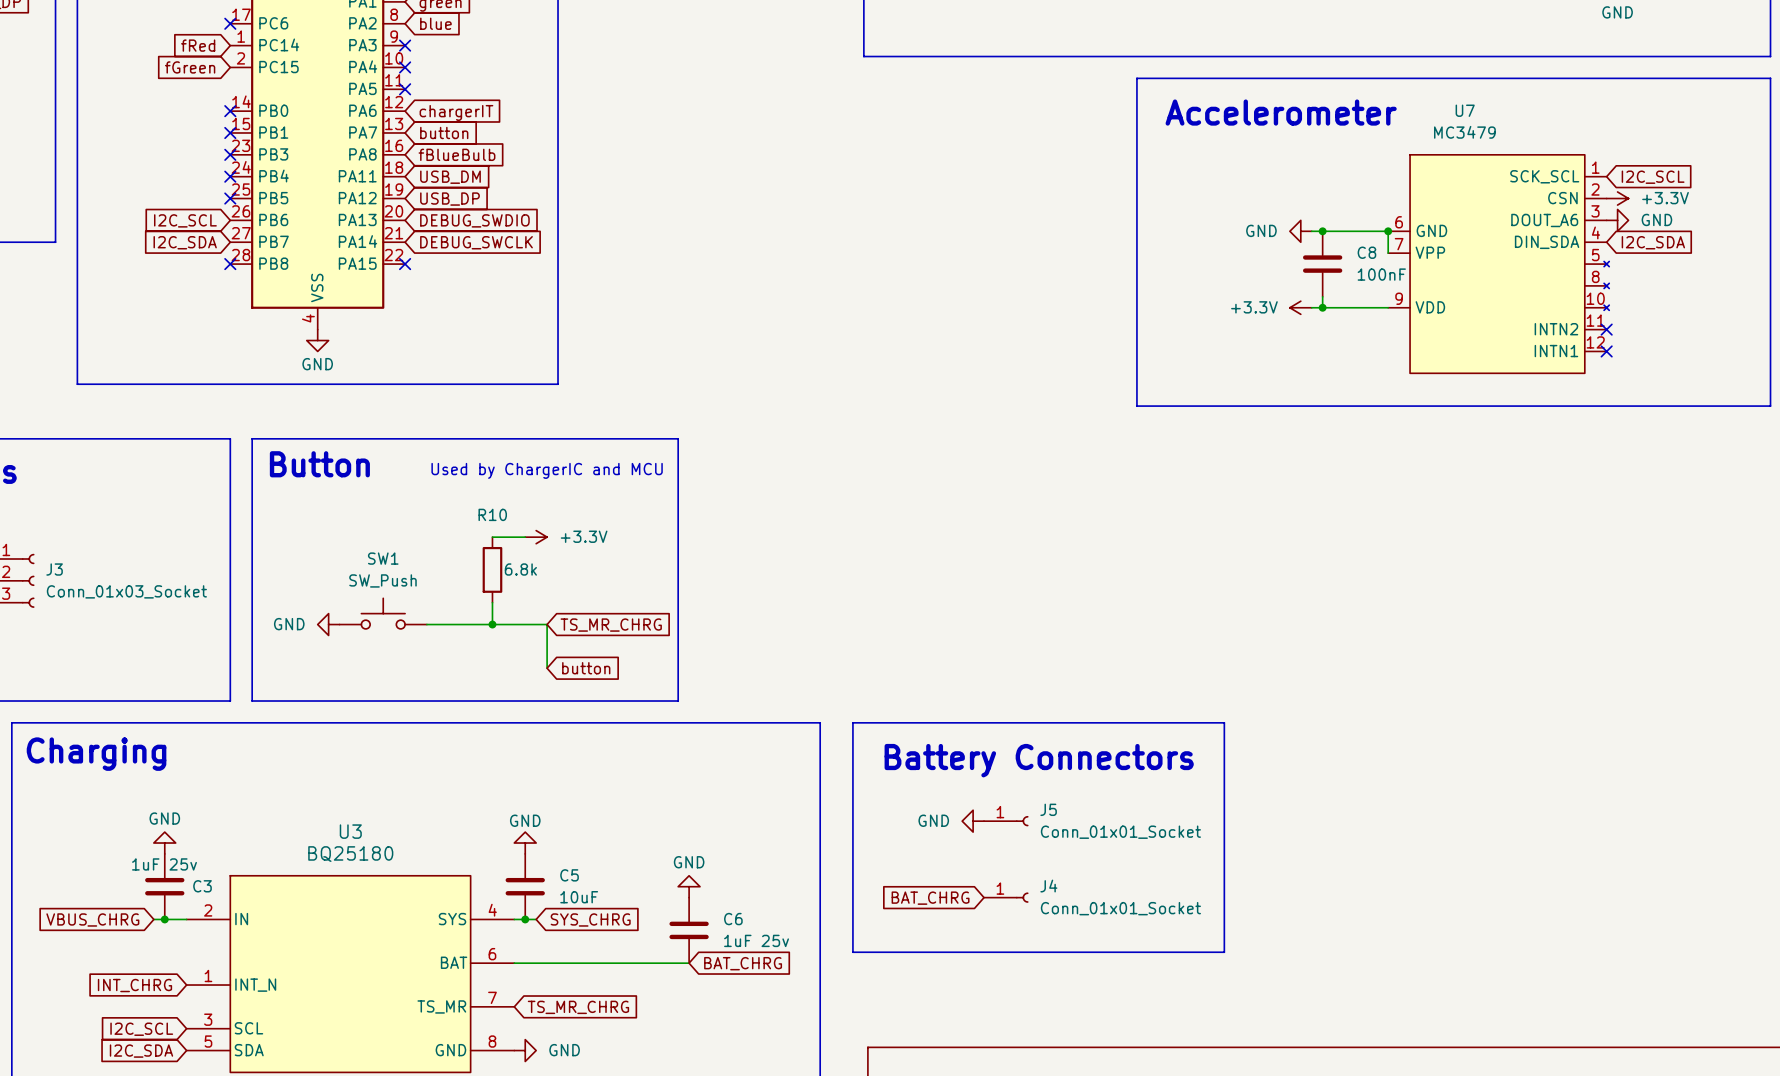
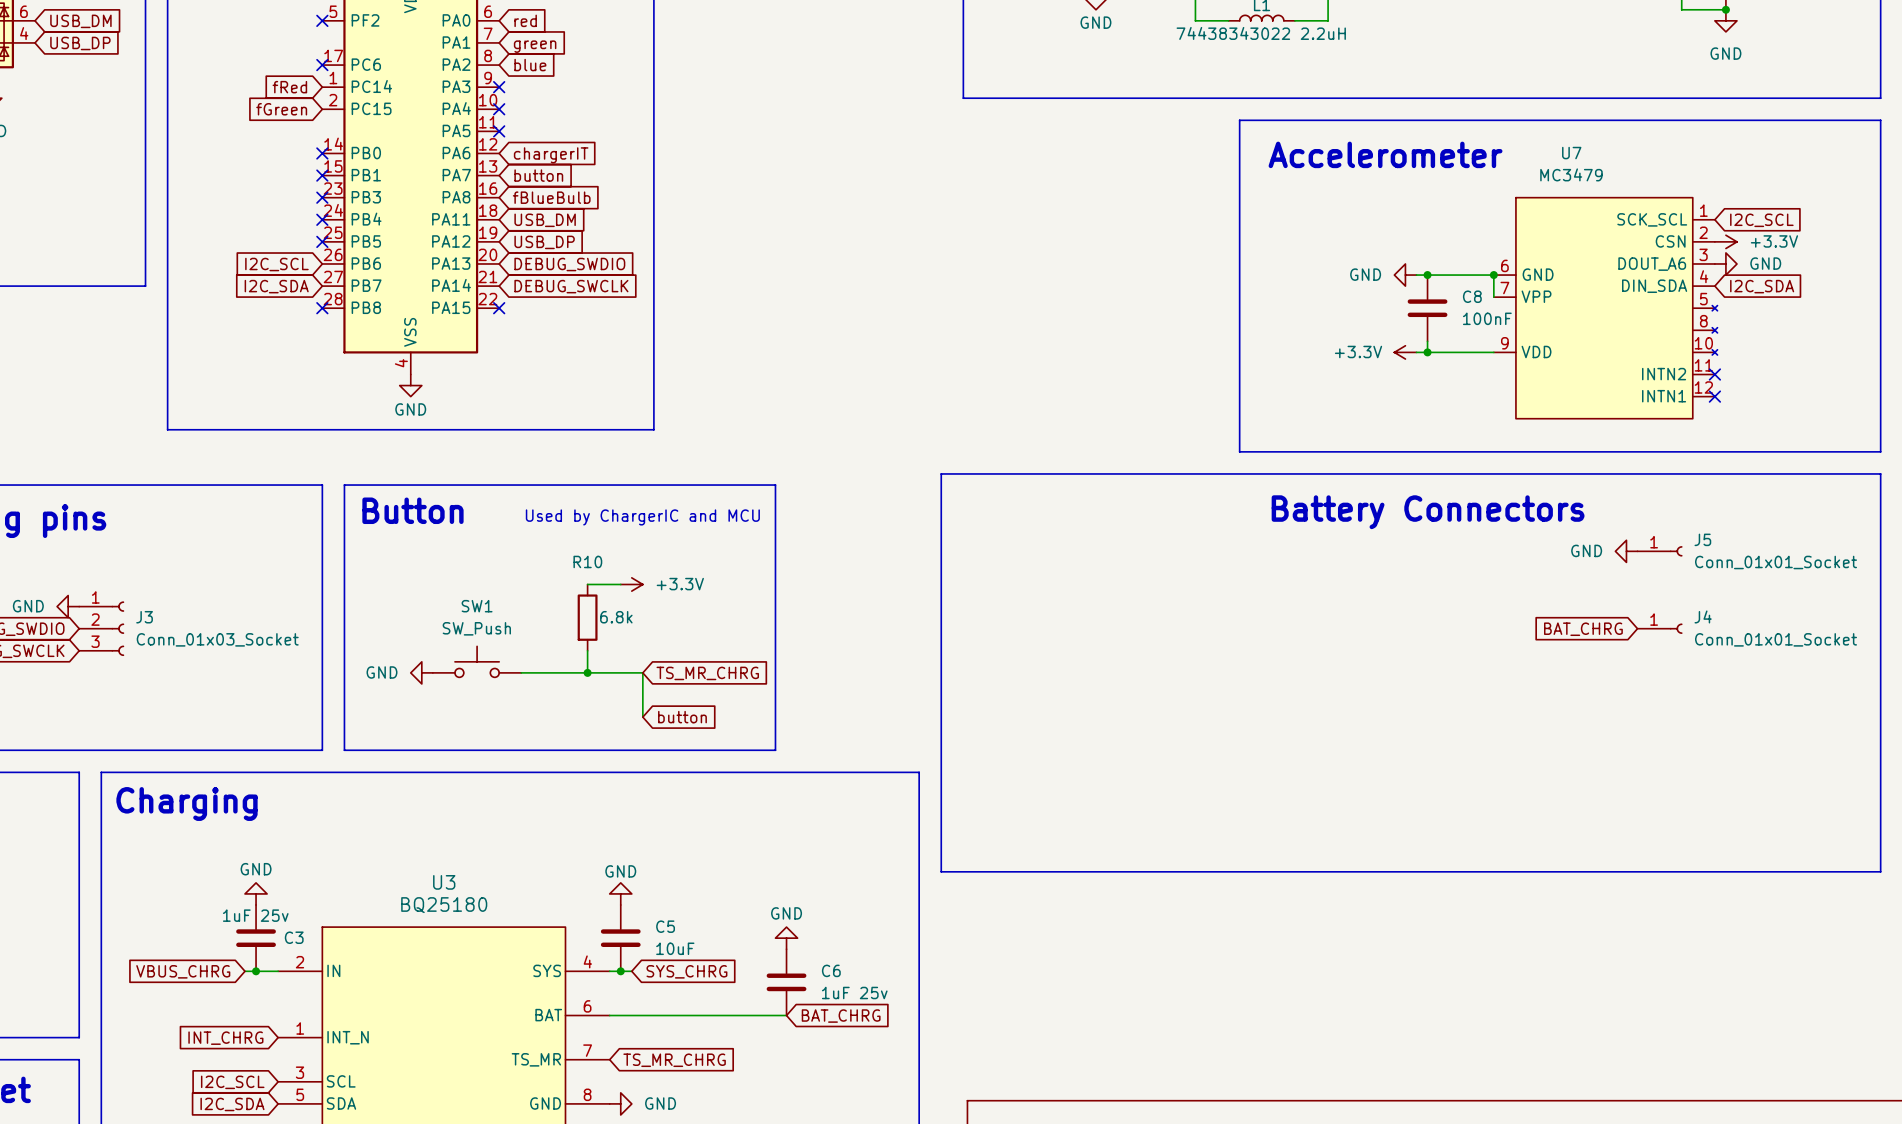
line: none -> (941, 473) (1880, 473) (1880, 871) (941, 871) (941, 473)
text: none -> Battery Connectors (1428, 512)
power symbol: none -> GND (1626, 551)
global label: none -> BAT_CHRG (1583, 629)
line: (852, 722) (1224, 722) (1224, 952) (852, 952) (852, 722) -> none
text: Battery Connectors (1039, 760) -> none
power symbol: GND (973, 821) -> none
J5 position: (1006, 821) -> (1659, 551)
J4 position: (1006, 897) -> (1659, 628)
global label: BAT_CHRG (930, 898) -> none

